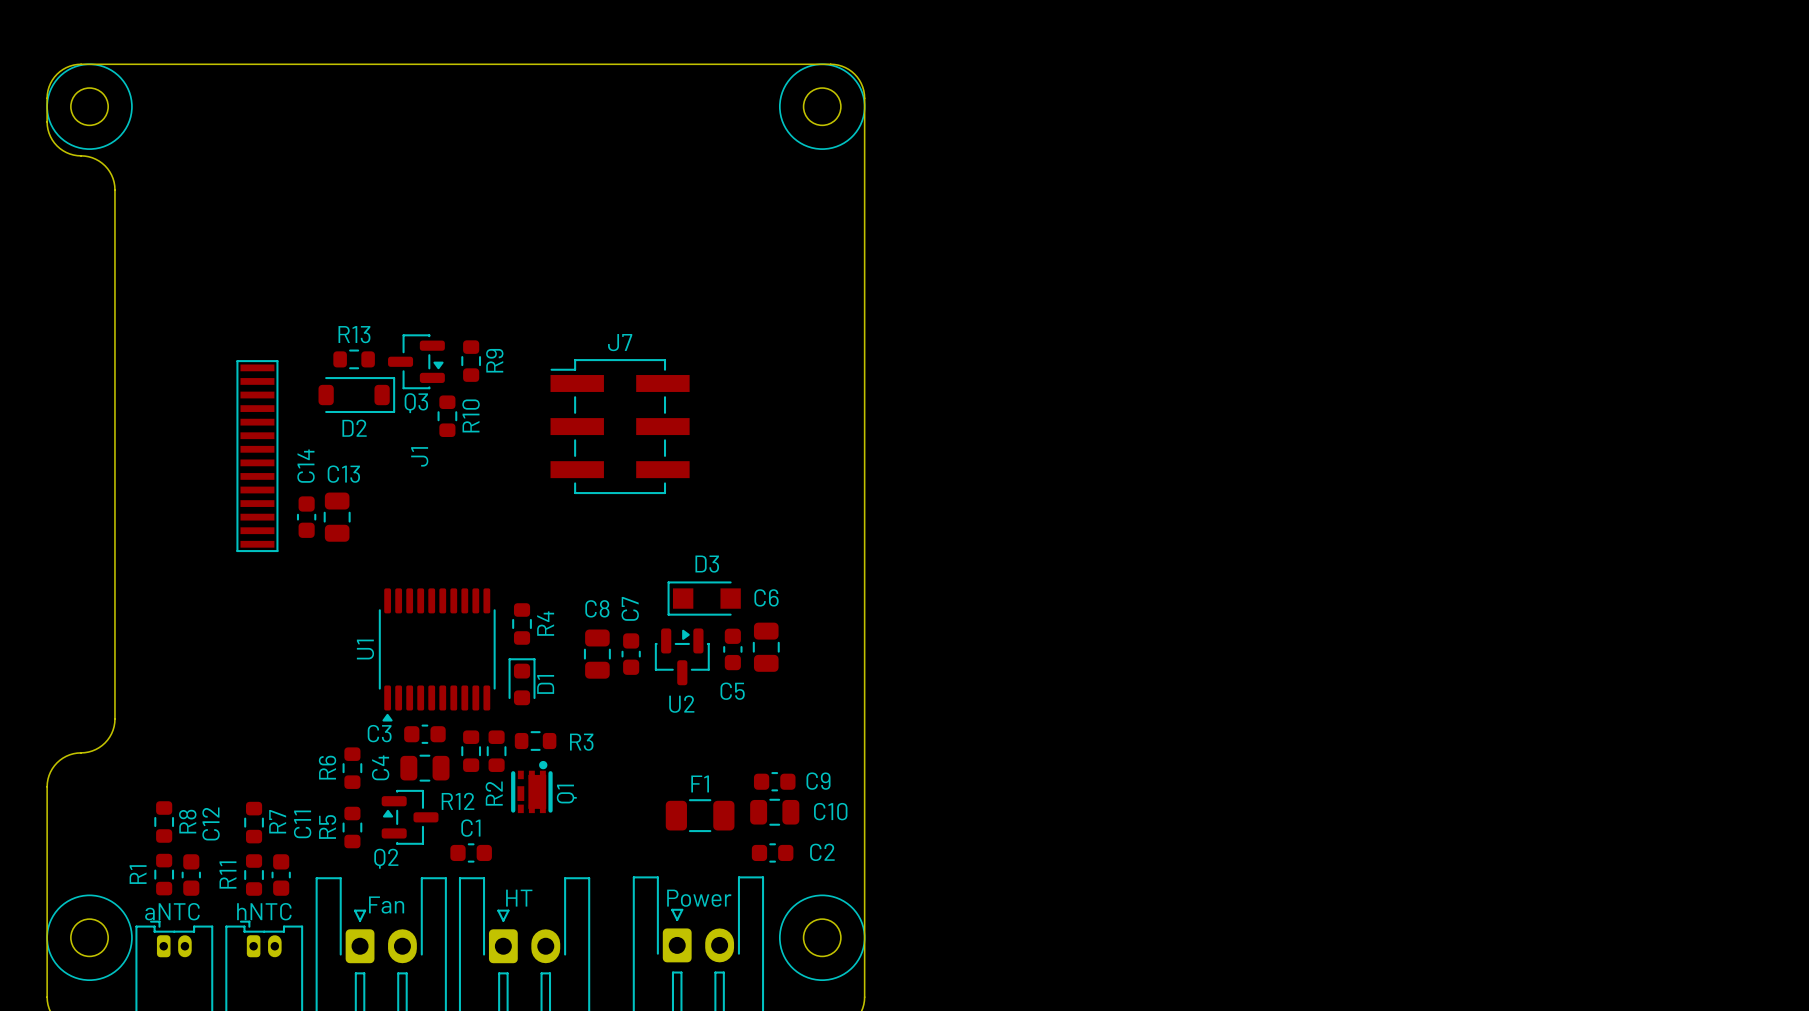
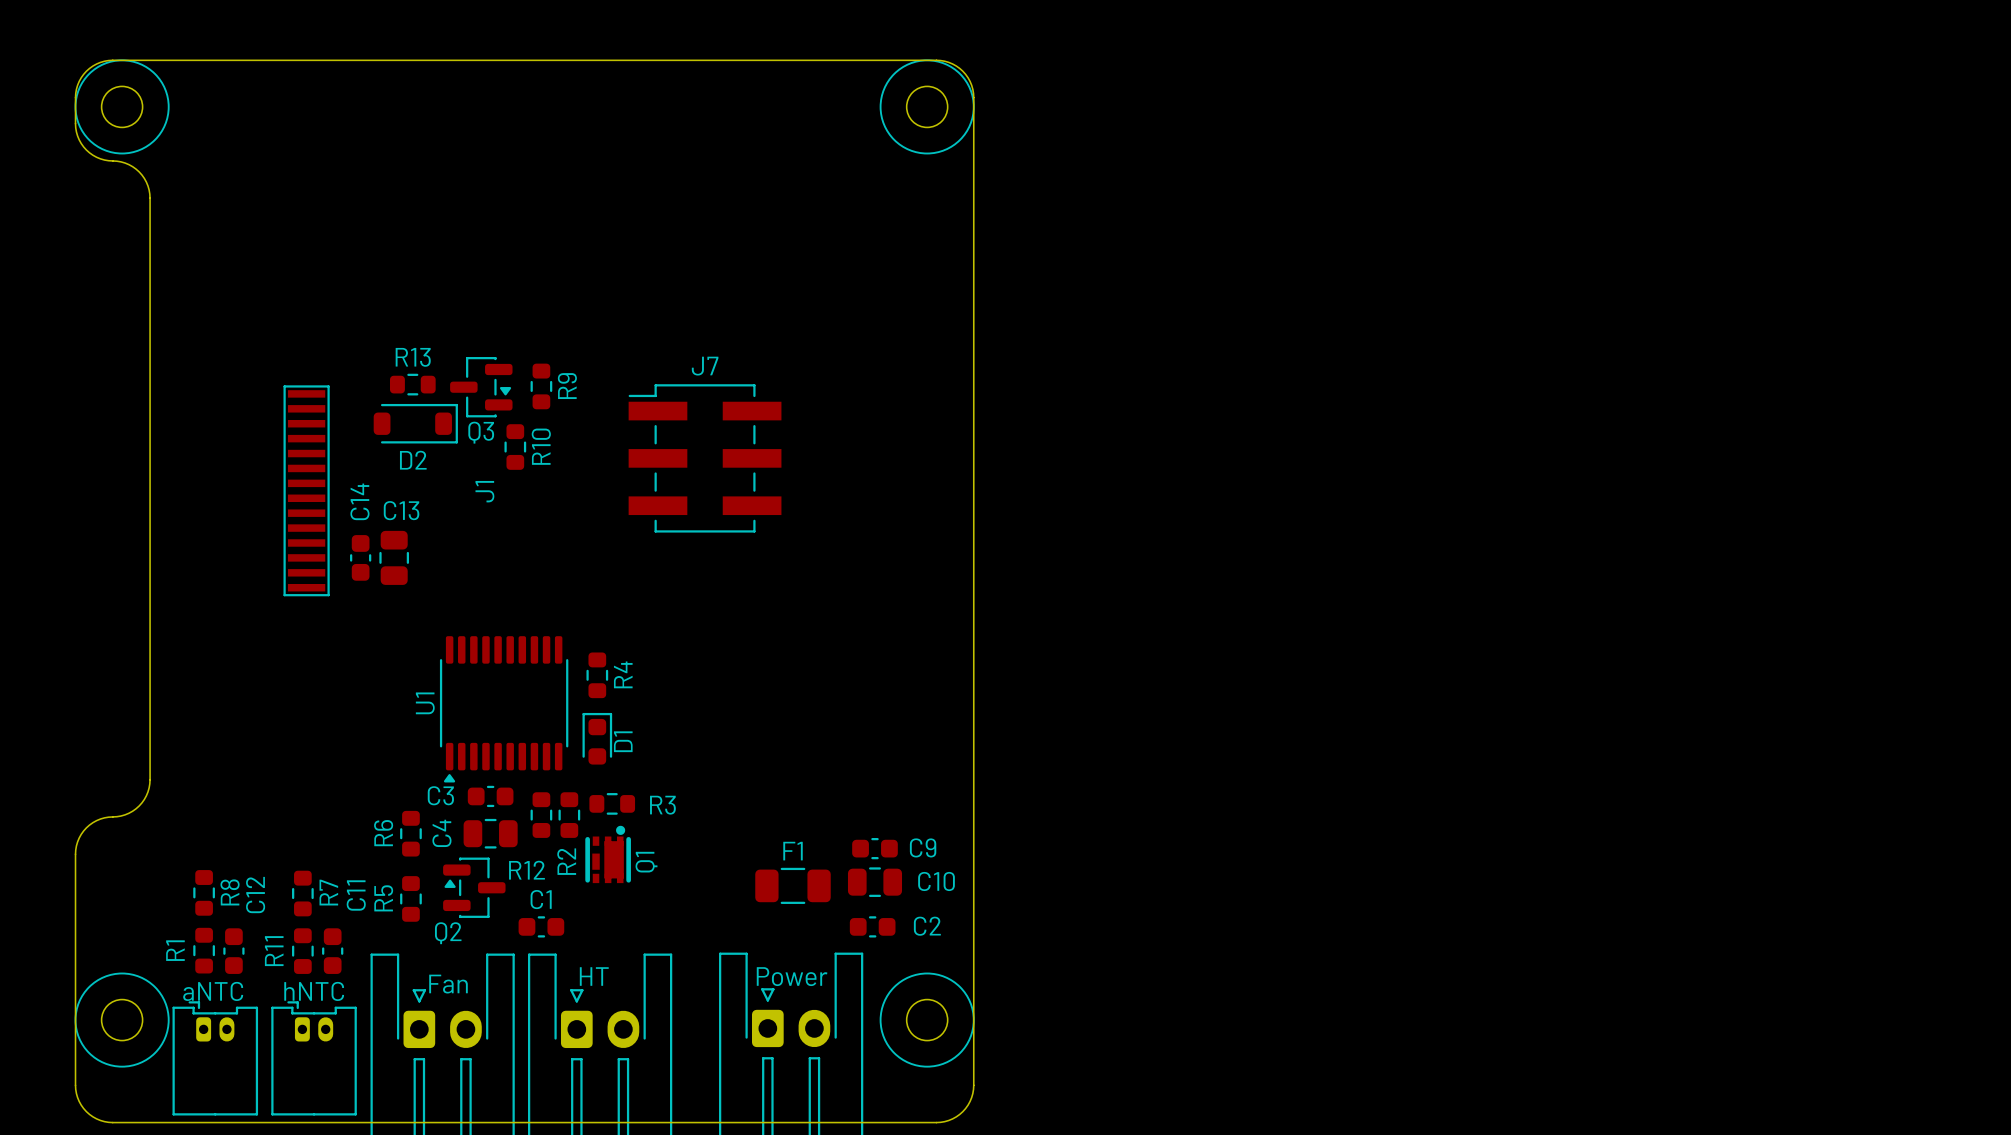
D3: (704, 598) -> none
C6: (766, 647) -> none
C5: (732, 649) -> none
C8: (597, 654) -> none
C7: (631, 654) -> none
U2: (682, 656) -> none

